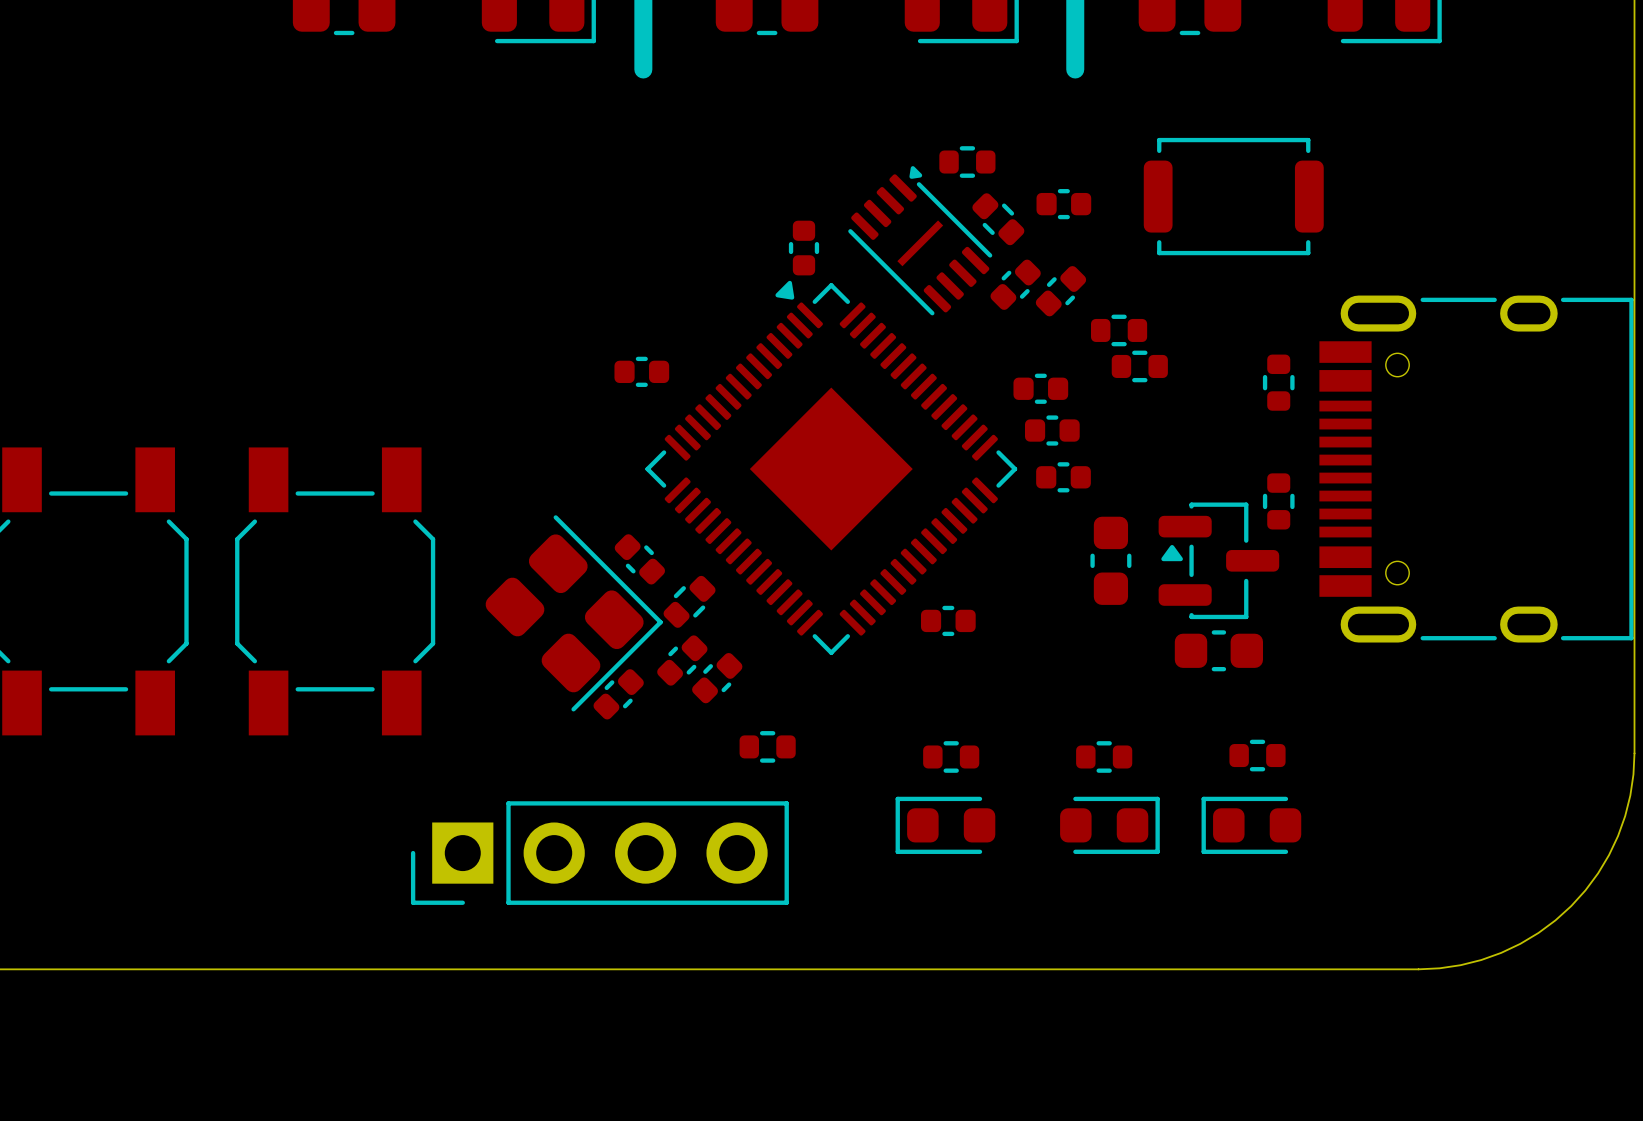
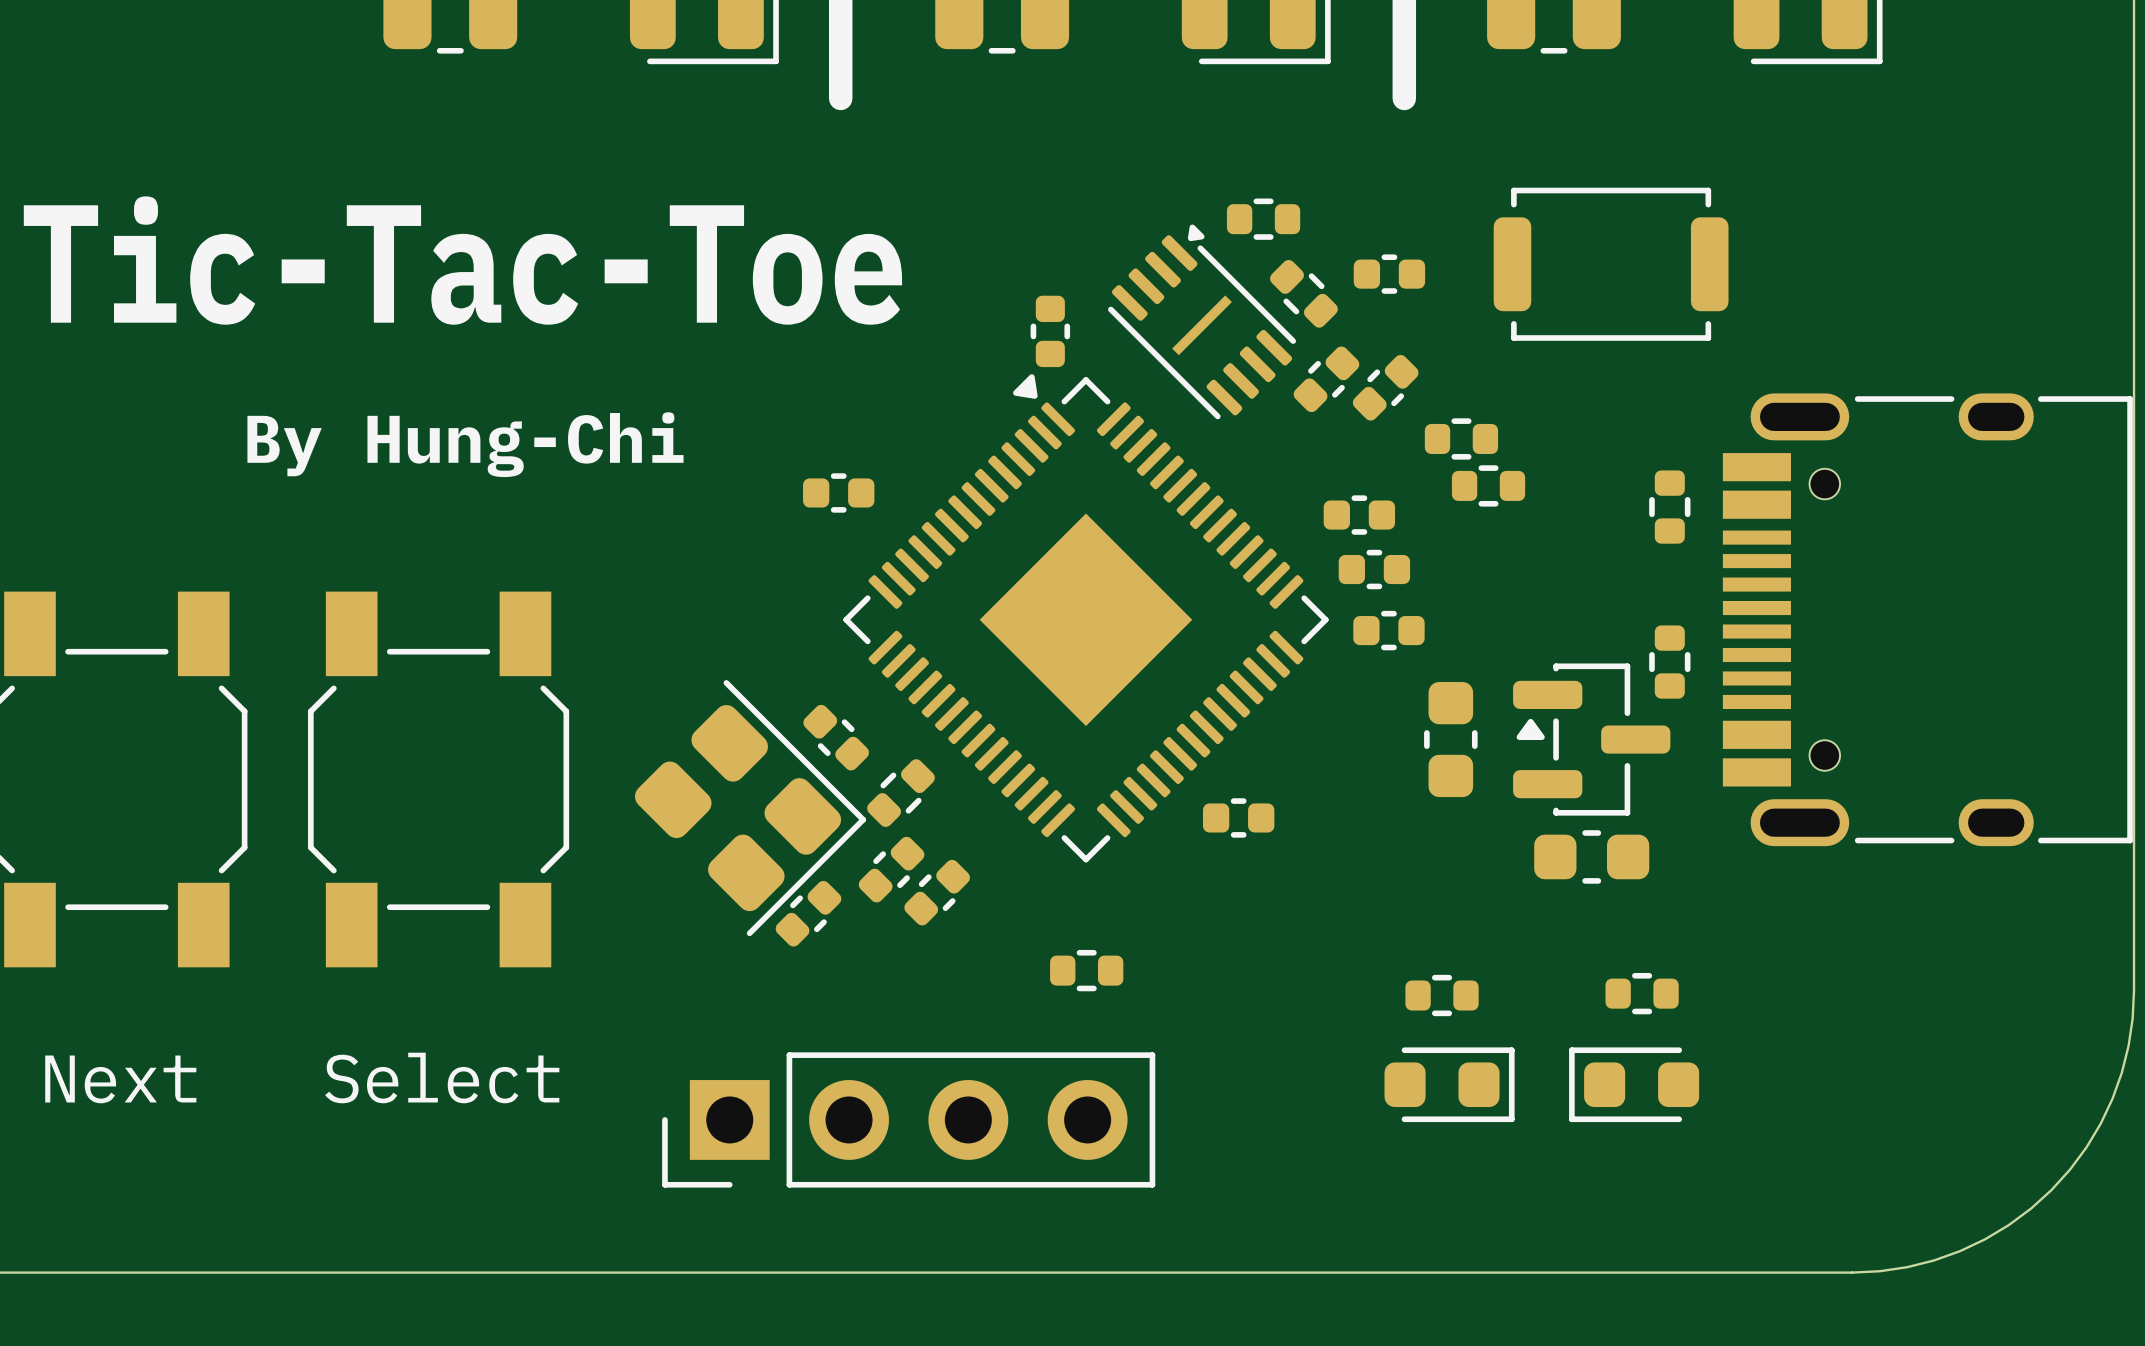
text: none -> Tic-Tac-Toe (462, 260)
text: none -> By Hung-Chi (465, 444)
part: none -> (1086, 970)
part: (767, 746) -> none
part: (951, 756) -> none
text: none -> Select (442, 1077)
text: none -> Next (120, 1079)
part: (945, 825) -> none
part position: (599, 853) -> (908, 1119)

